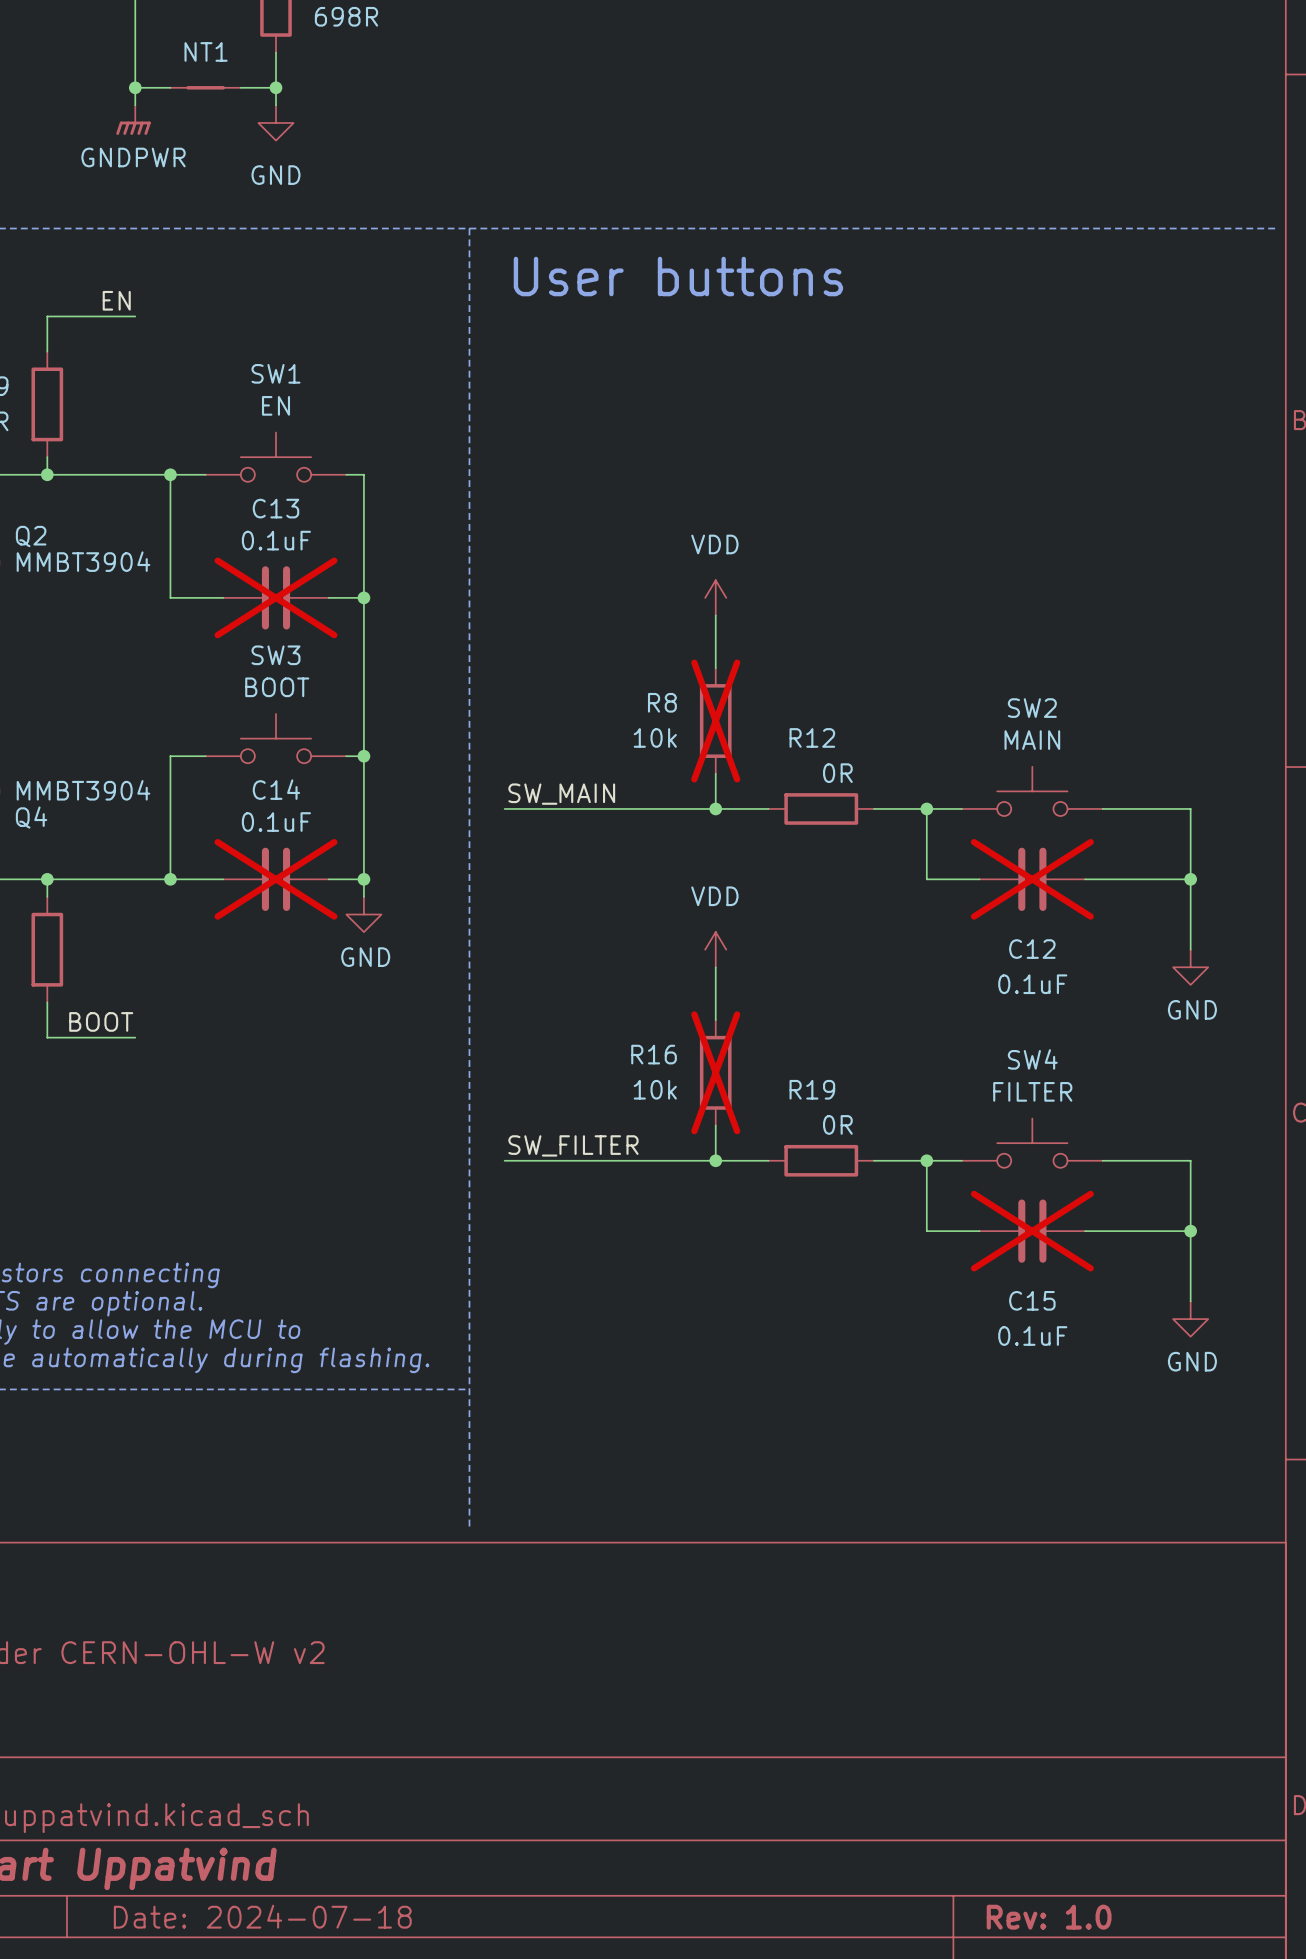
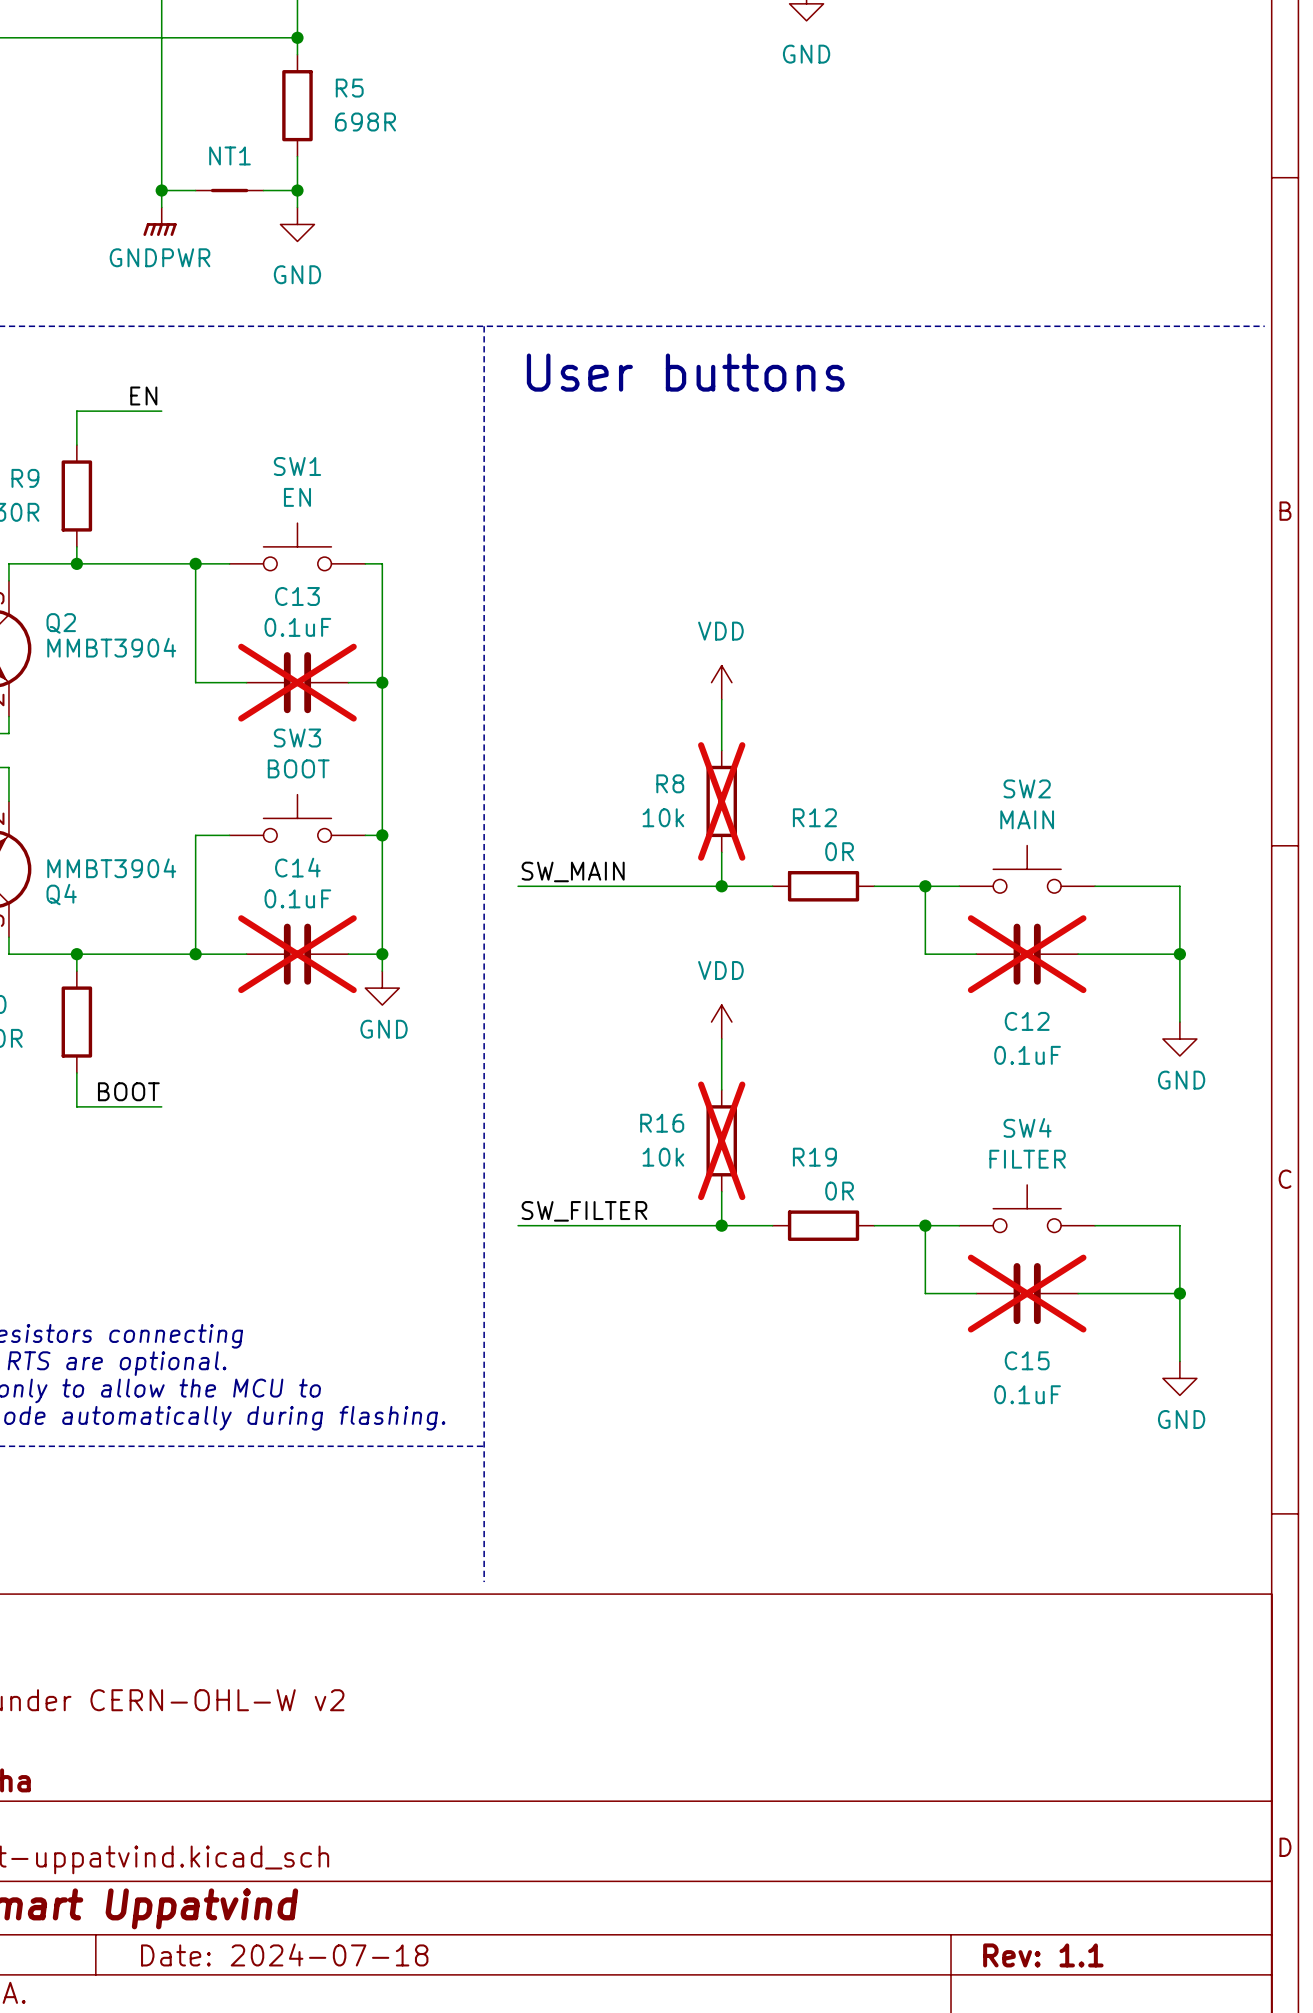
title block: Rev: 1.0 (1049, 1917) -> Rev: 1.1 (1043, 1955)

